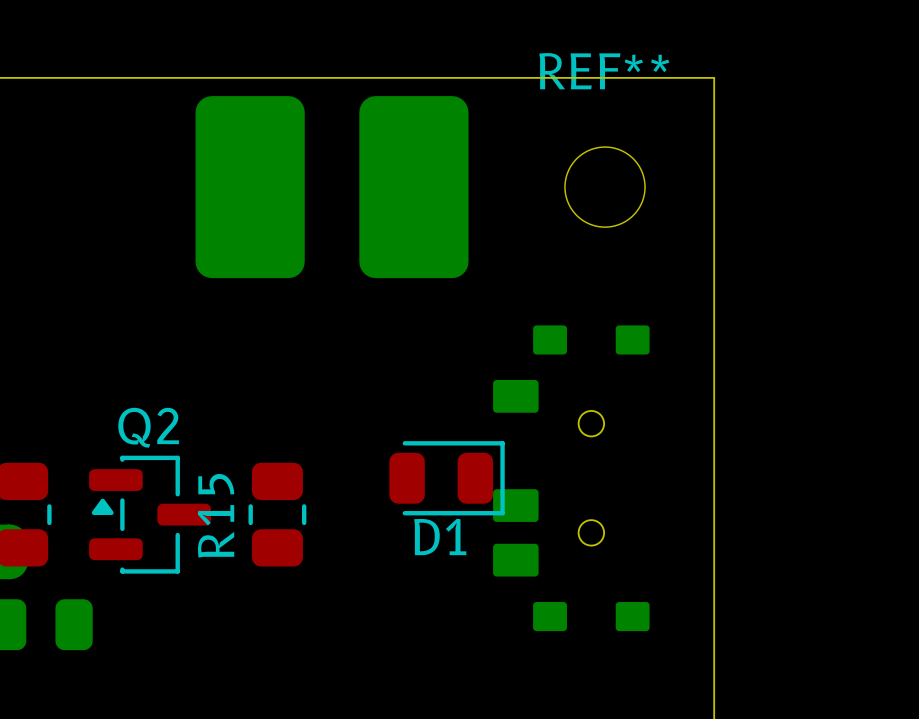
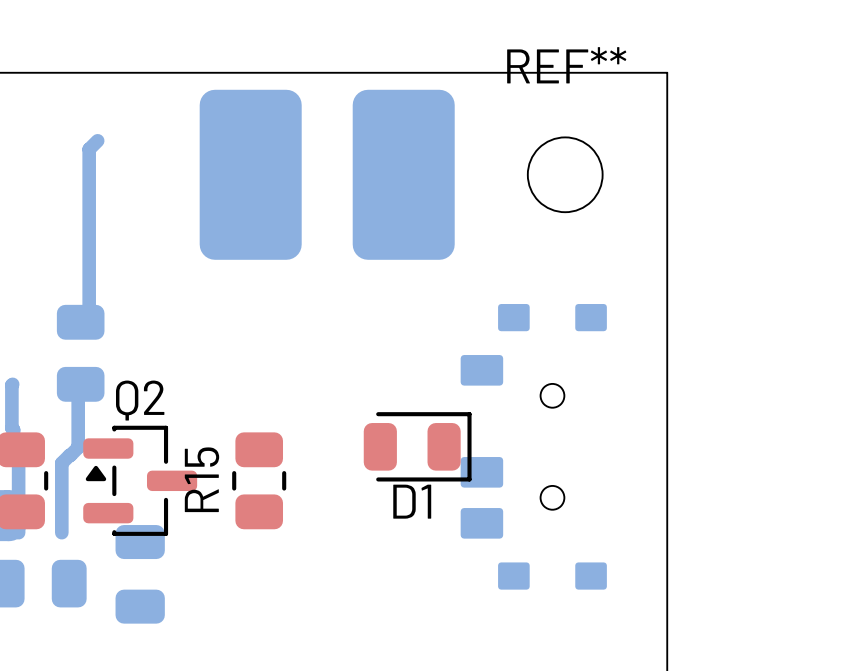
bottom track: none -> (97, 140) (89, 149) (89, 313) (80, 322)
part position: (332, 187) -> (327, 174)
part: none -> (80, 353)
bottom track: none -> (12, 384) (11, 428) (13, 429) (14, 455) (18, 459) (18, 532)
bottom track: none -> (80, 384) (78, 386) (78, 446) (61, 463) (61, 532)
part: none -> (140, 574)

